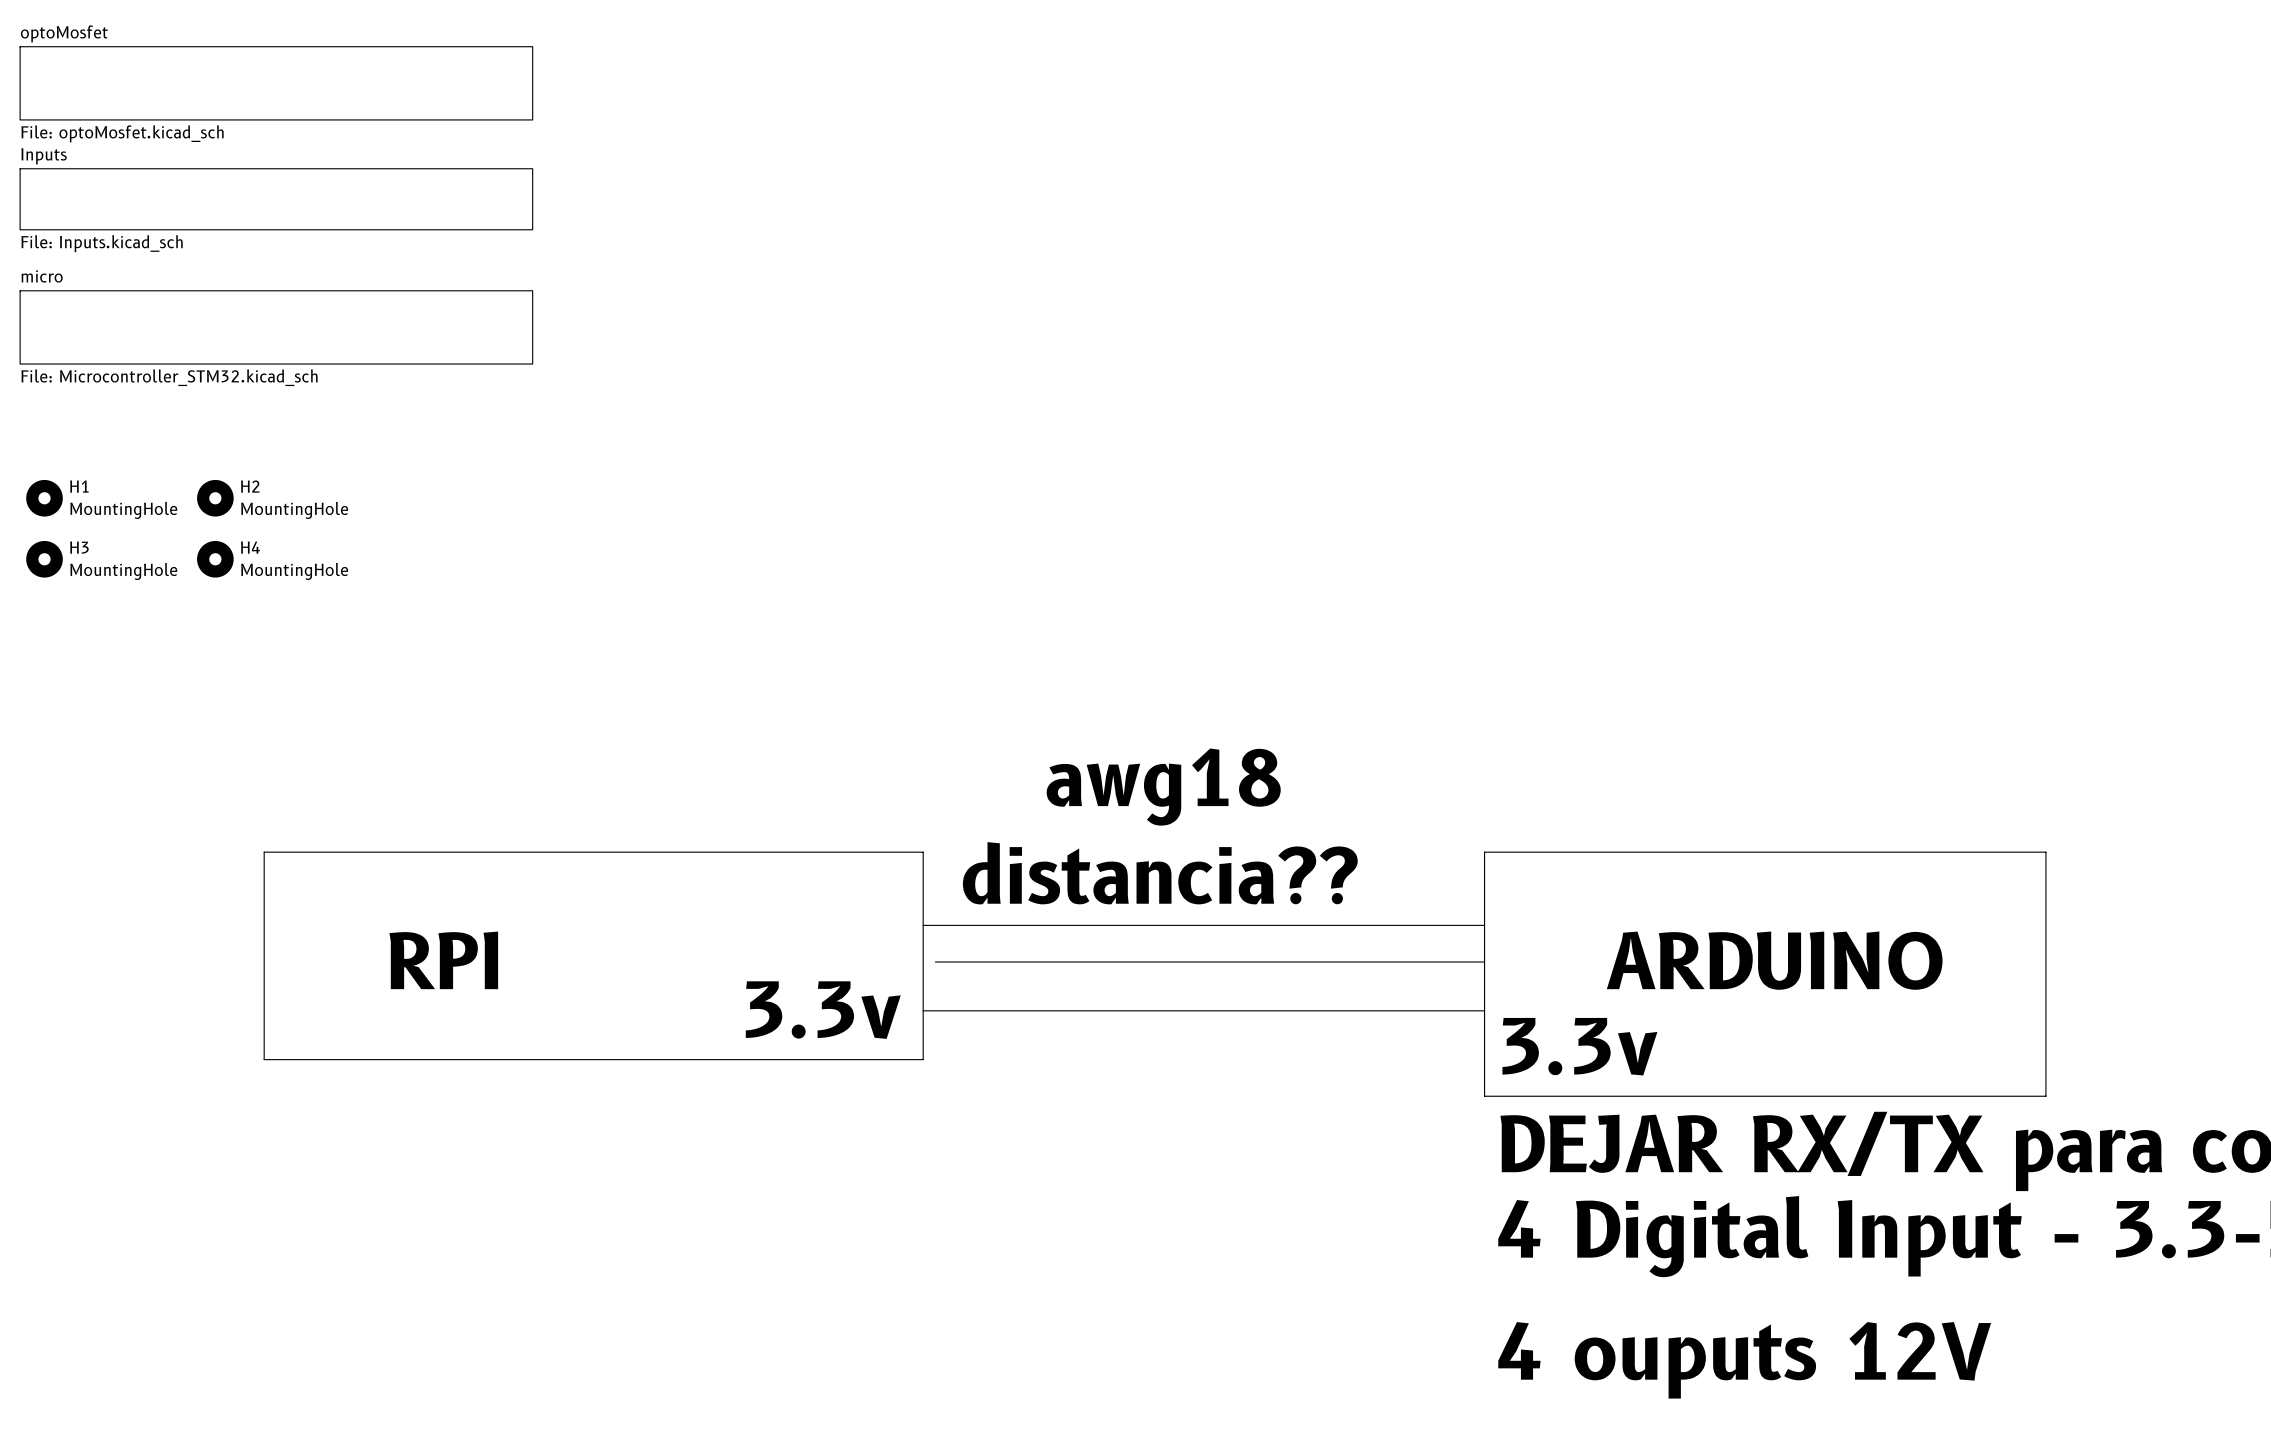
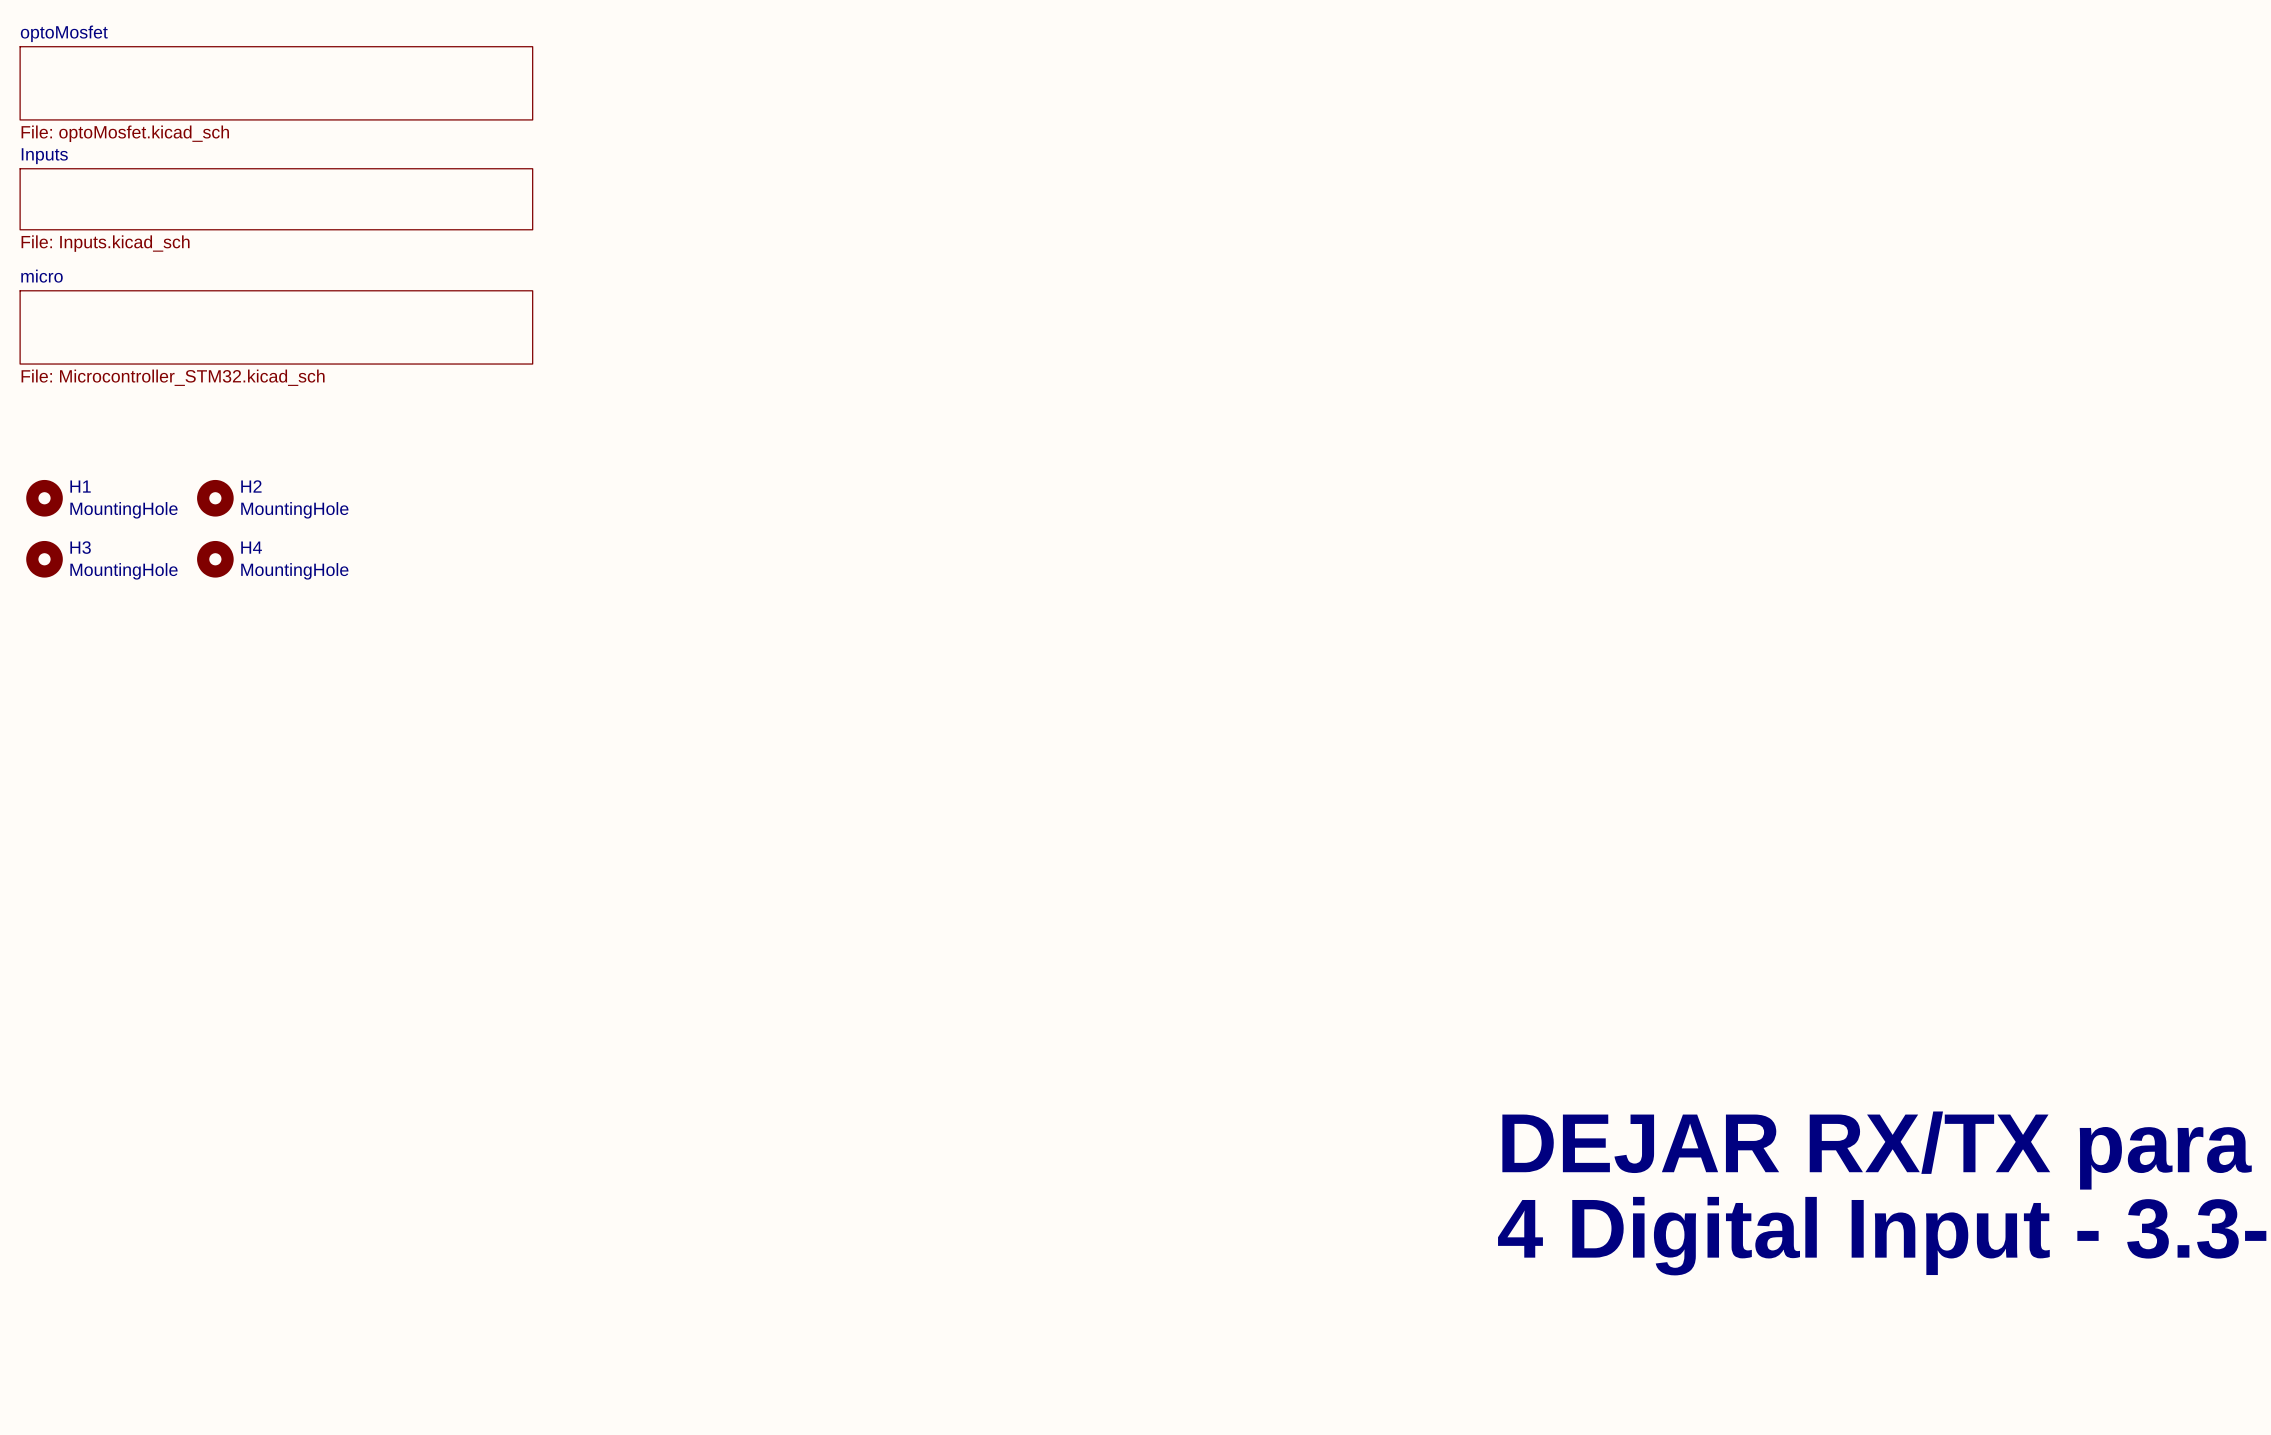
text: awg18 (1163, 787) -> none
line: (264, 852) (923, 852) (923, 1059) (264, 1059) (264, 852) -> none
line: (1484, 852) (2045, 852) (2045, 1096) (1484, 1096) (1484, 852) -> none
text: distancia?? (1160, 873) -> none
wire: (923, 925) (1484, 925) -> none
text: RPI (443, 960) -> none
text: ARDUINO (1774, 960) -> none
wire: (935, 962) (1484, 962) -> none
text: 3.3v (823, 1010) -> none
wire: (923, 1010) (1484, 1010) -> none
text: 3.3v (1579, 1046) -> none
text: 4 ouputs 12V (1744, 1360) -> none

